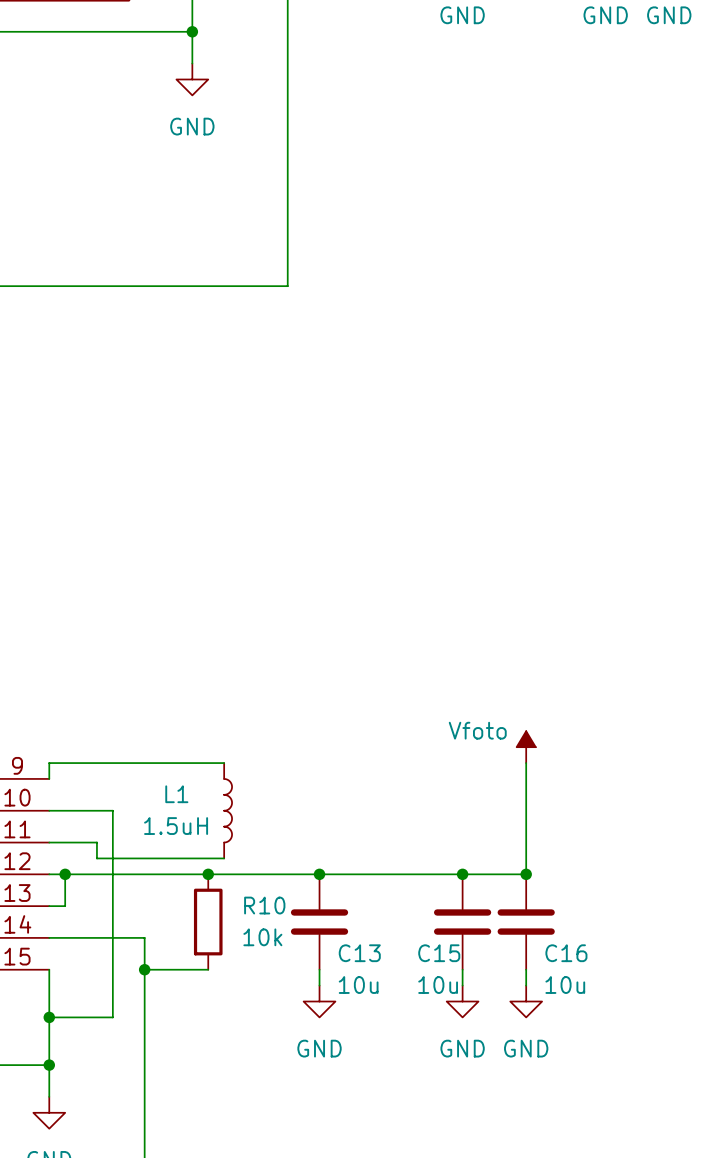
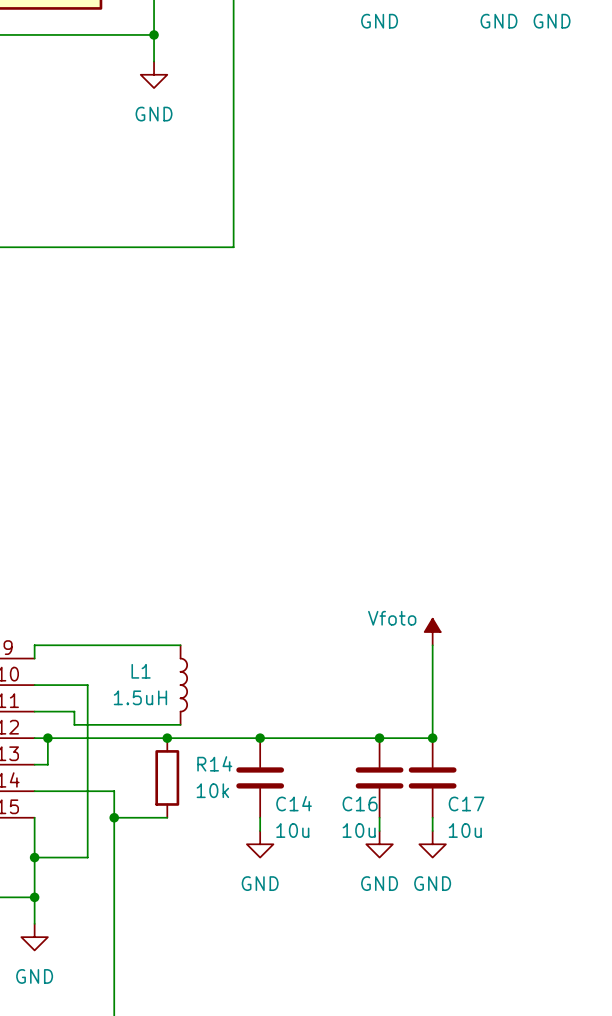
R10 name: R10 (264, 905) -> R14 (214, 763)
C13 name: C13 (359, 953) -> C14 (294, 803)
C15 name: C15 (439, 953) -> C16 (360, 803)
C16 name: C16 (566, 953) -> C17 (466, 803)

